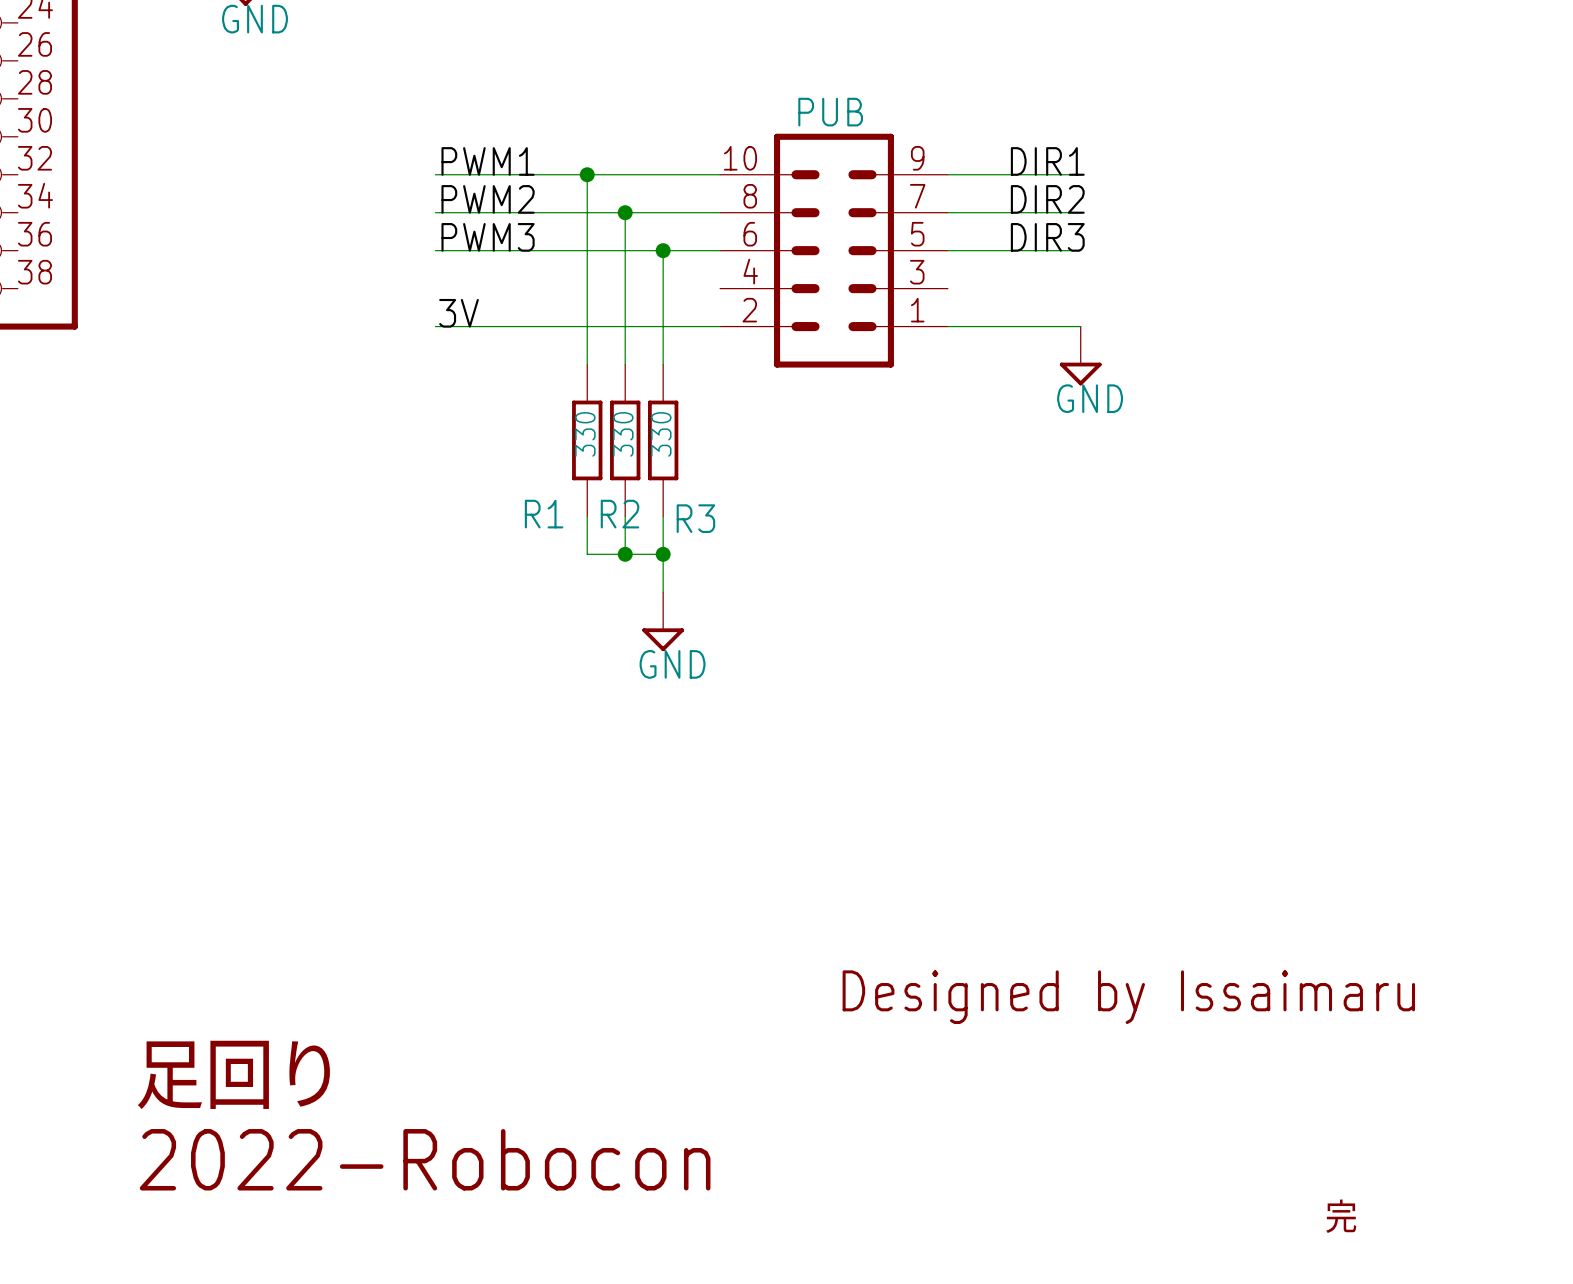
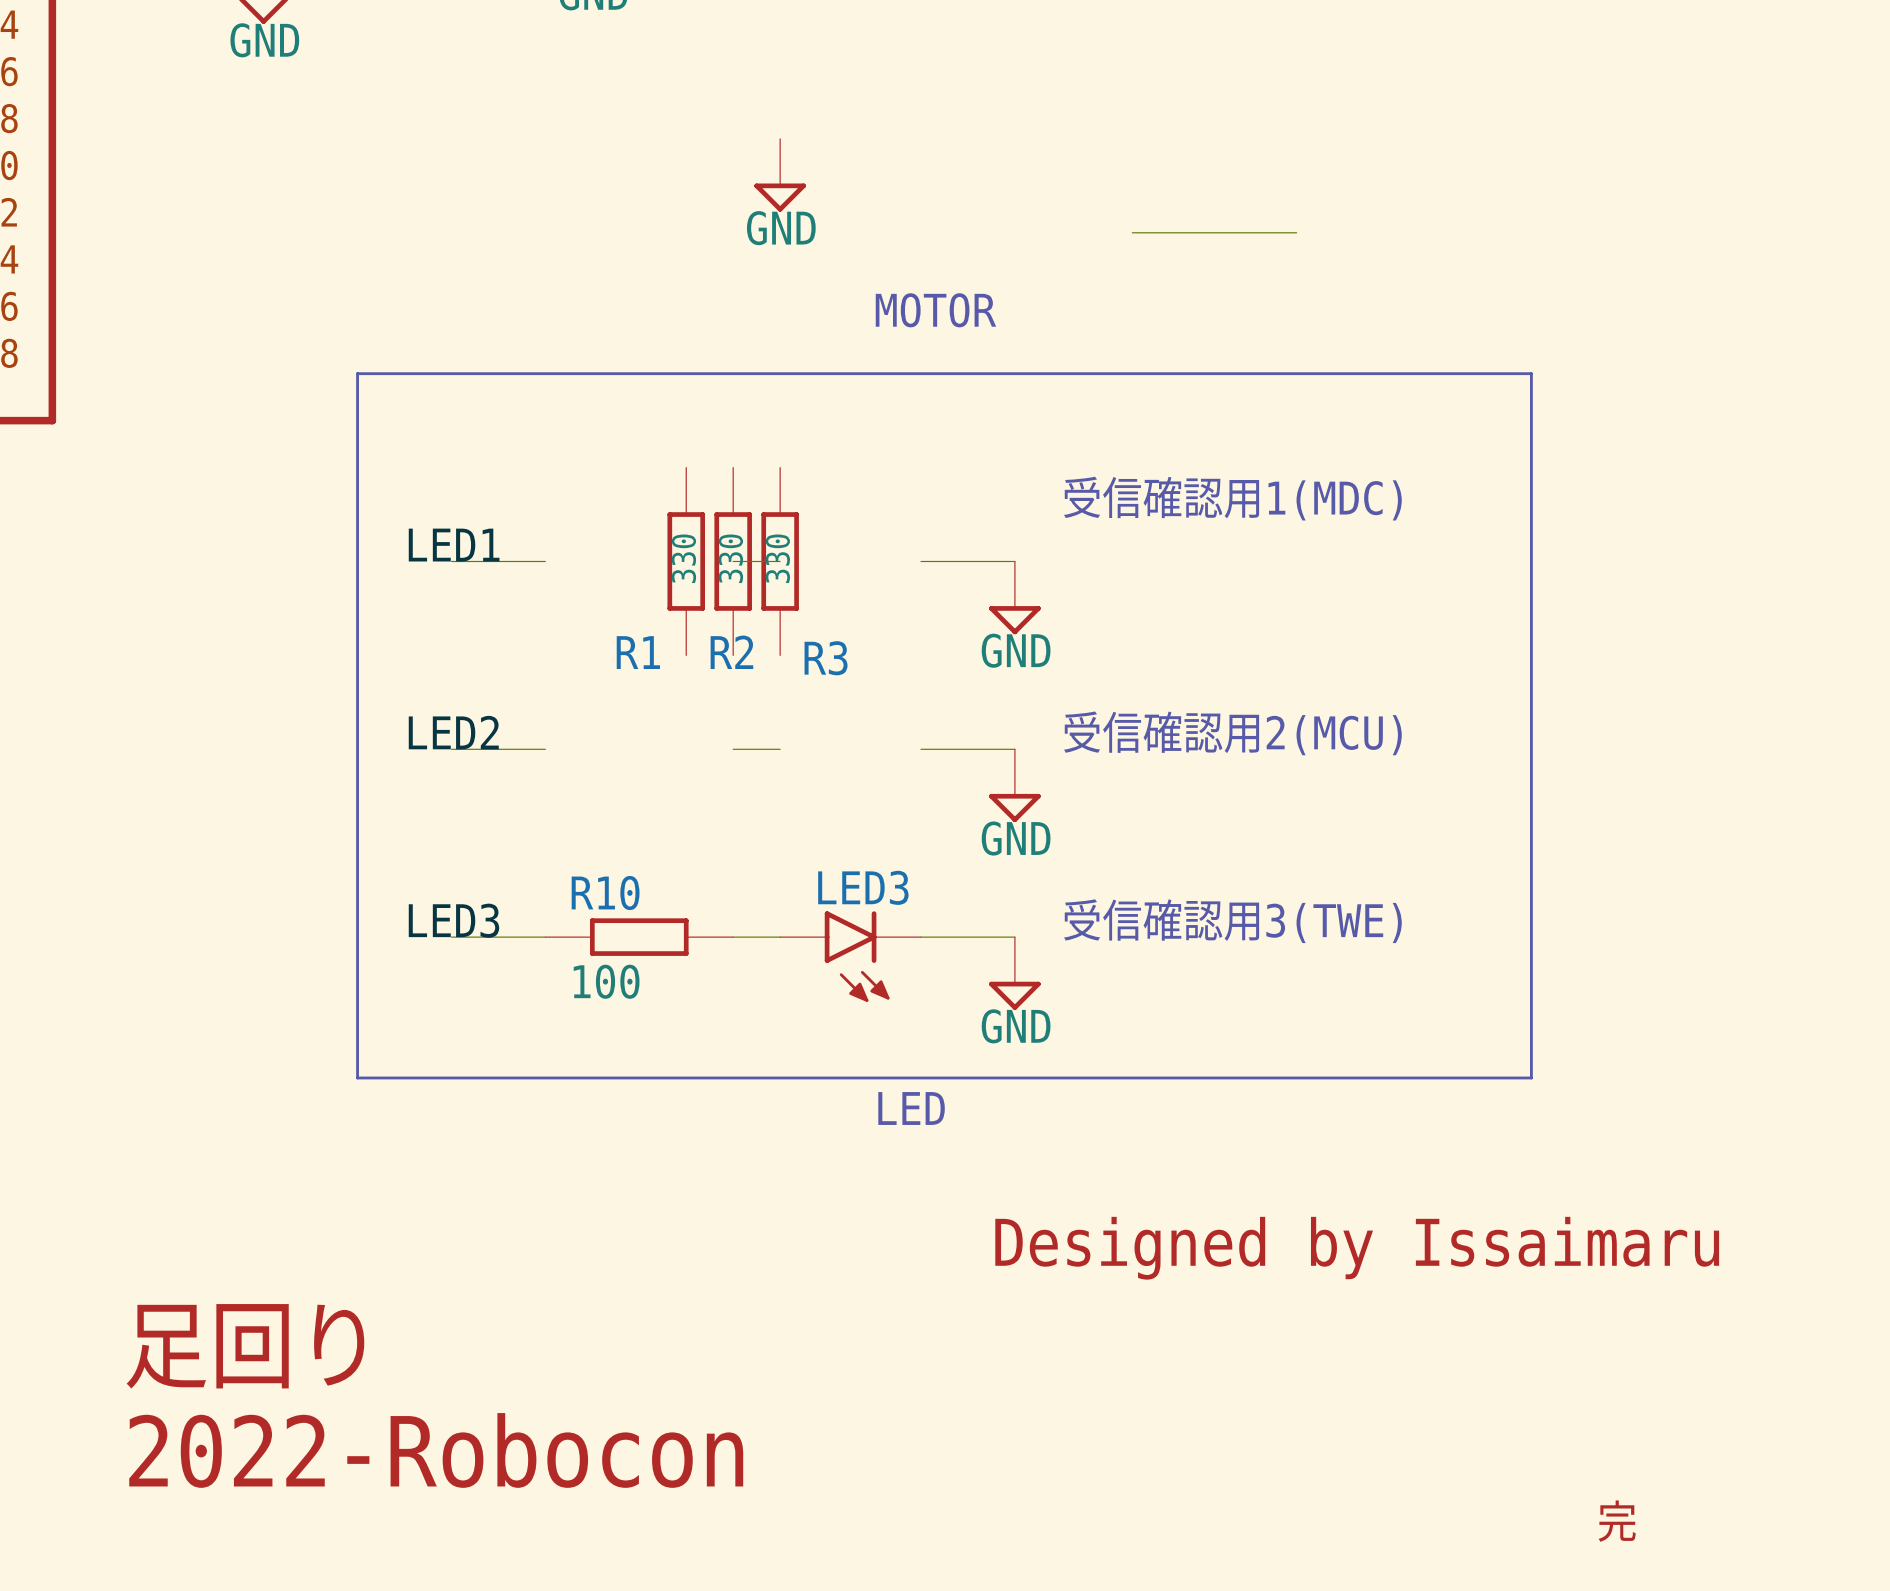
power symbol: none -> GND (780, 175)
label: PWM1 (488, 161) -> none
label: DIR1 (1047, 161) -> none
wire: (435, 174) (720, 174) -> none
wire: (587, 174) (587, 364) -> none
junction: (587, 174) -> none
label: PWM2 (488, 199) -> none
label: DIR2 (1047, 199) -> none
wire: (435, 212) (720, 212) -> none
wire: (625, 212) (625, 364) -> none
junction: (625, 212) -> none
wire: (947, 212) (1080, 212) -> none
label: PWM3 (488, 237) -> none
text: none -> MOTOR (935, 310)
label: DIR3 (1047, 237) -> none
wire: (435, 250) (720, 250) -> none
wire: (663, 250) (663, 364) -> none
junction: (663, 250) -> none
PUB: (833, 250) -> none
wire: (947, 250) (1080, 250) -> none
line: none -> (357, 373) (357, 1077) (1531, 1077) (1531, 373) (357, 373)
label: 3V (459, 313) -> none
wire: (435, 326) (720, 326) -> none
wire: (947, 326) (1080, 326) -> none
power symbol: GND (1080, 355) -> none
text: none -> 受信確認用1(MDC) (1232, 498)
label: none -> LED1 (454, 545)
wire: none -> (451, 561) (545, 561)
wire: none -> (733, 561) (780, 561)
wire: none -> (921, 561) (1014, 561)
power symbol: none -> GND (1014, 597)
wire: (587, 516) (587, 554) (663, 554) -> none
wire: (625, 516) (625, 554) -> none
wire: (663, 516) (663, 592) -> (733, 749) (780, 749)
junction: (625, 554) -> none
junction: (663, 554) -> none
label: none -> LED2 (453, 732)
text: none -> 受信確認用2(MCU) (1232, 733)
wire: none -> (451, 749) (545, 749)
wire: none -> (921, 749) (1014, 749)
power symbol: GND (663, 621) -> none
power symbol: none -> GND (1014, 785)
label: none -> LED3 (453, 920)
text: none -> 受信確認用3(TWE) (1232, 921)
wire: none -> (451, 937) (545, 937)
R10: none -> 100 (639, 937)
wire: none -> (733, 937) (780, 937)
wire: none -> (921, 937) (1014, 937)
LED3: none -> (850, 956)
power symbol: none -> GND (1014, 973)
text: none -> LED (911, 1108)

